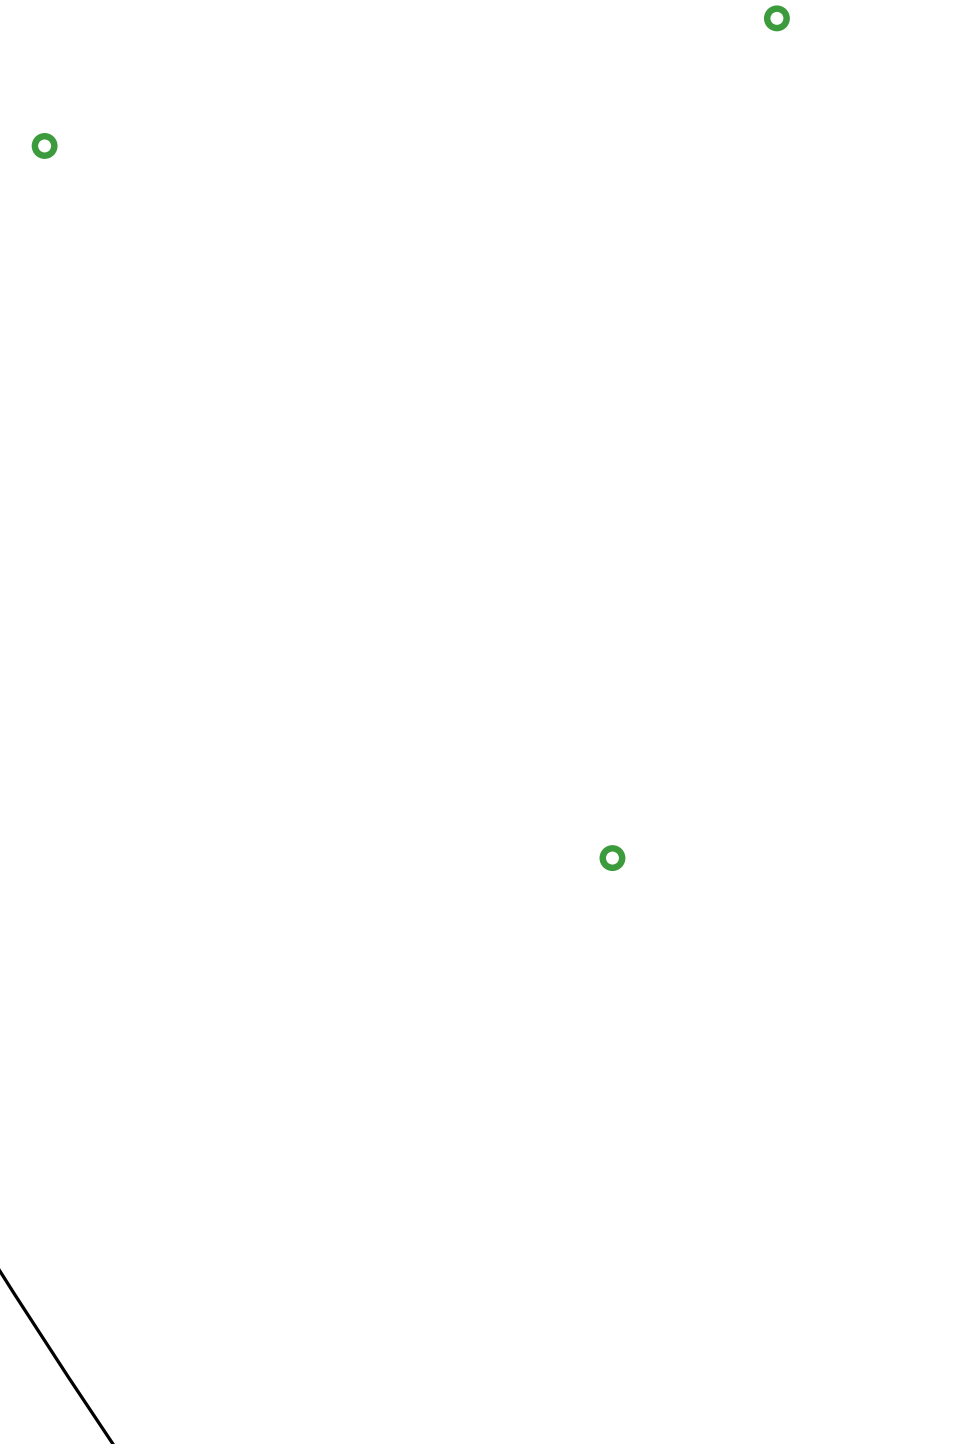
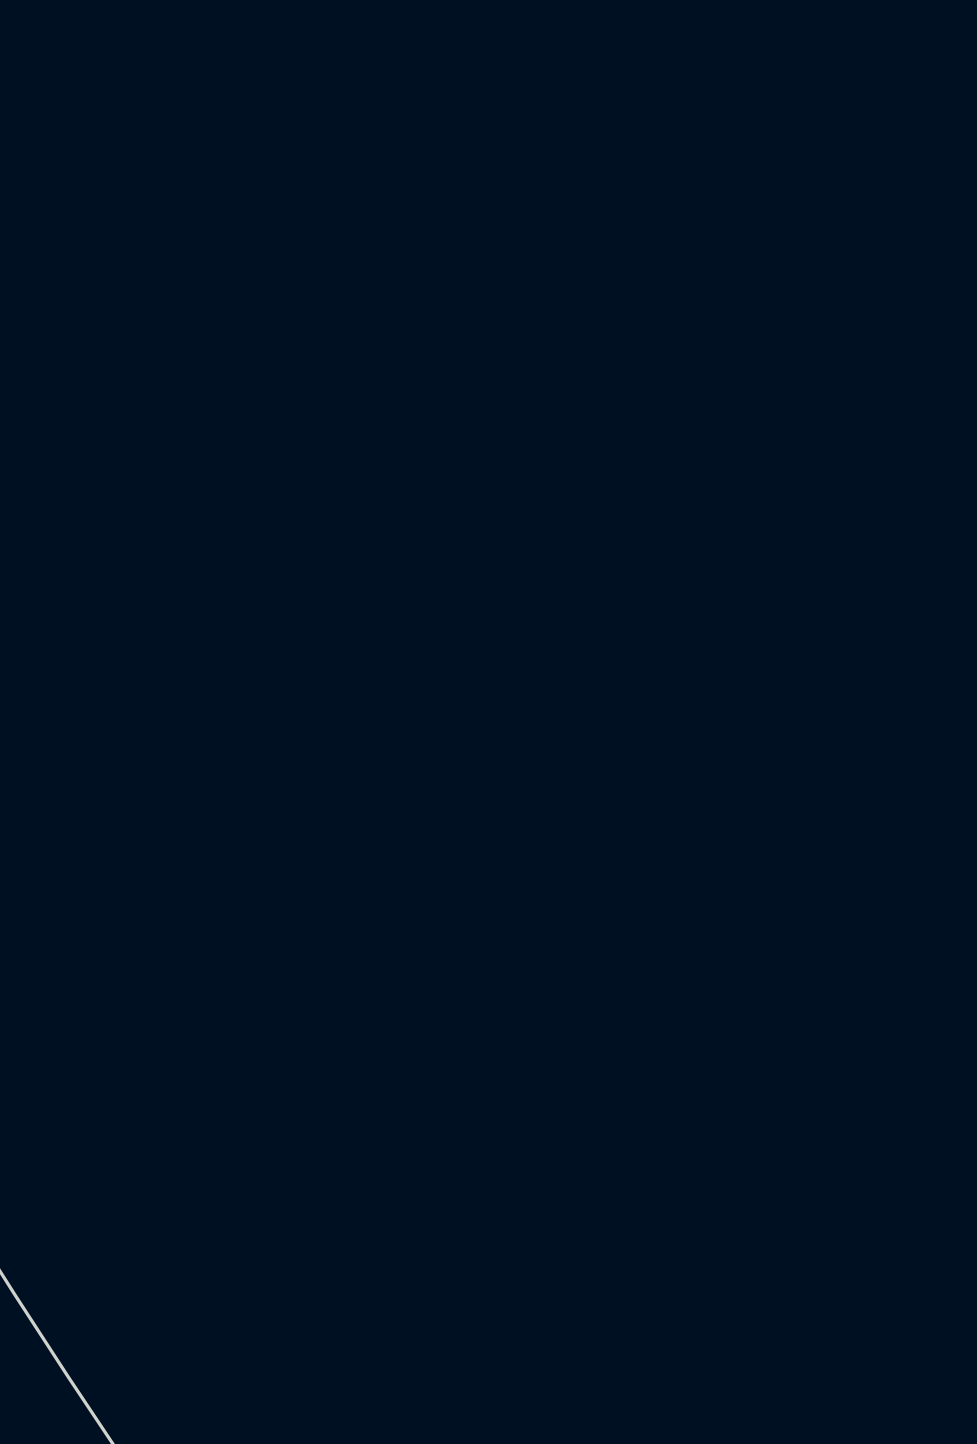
via: (776, 18) -> none
via: (44, 145) -> none
via: (612, 858) -> none

